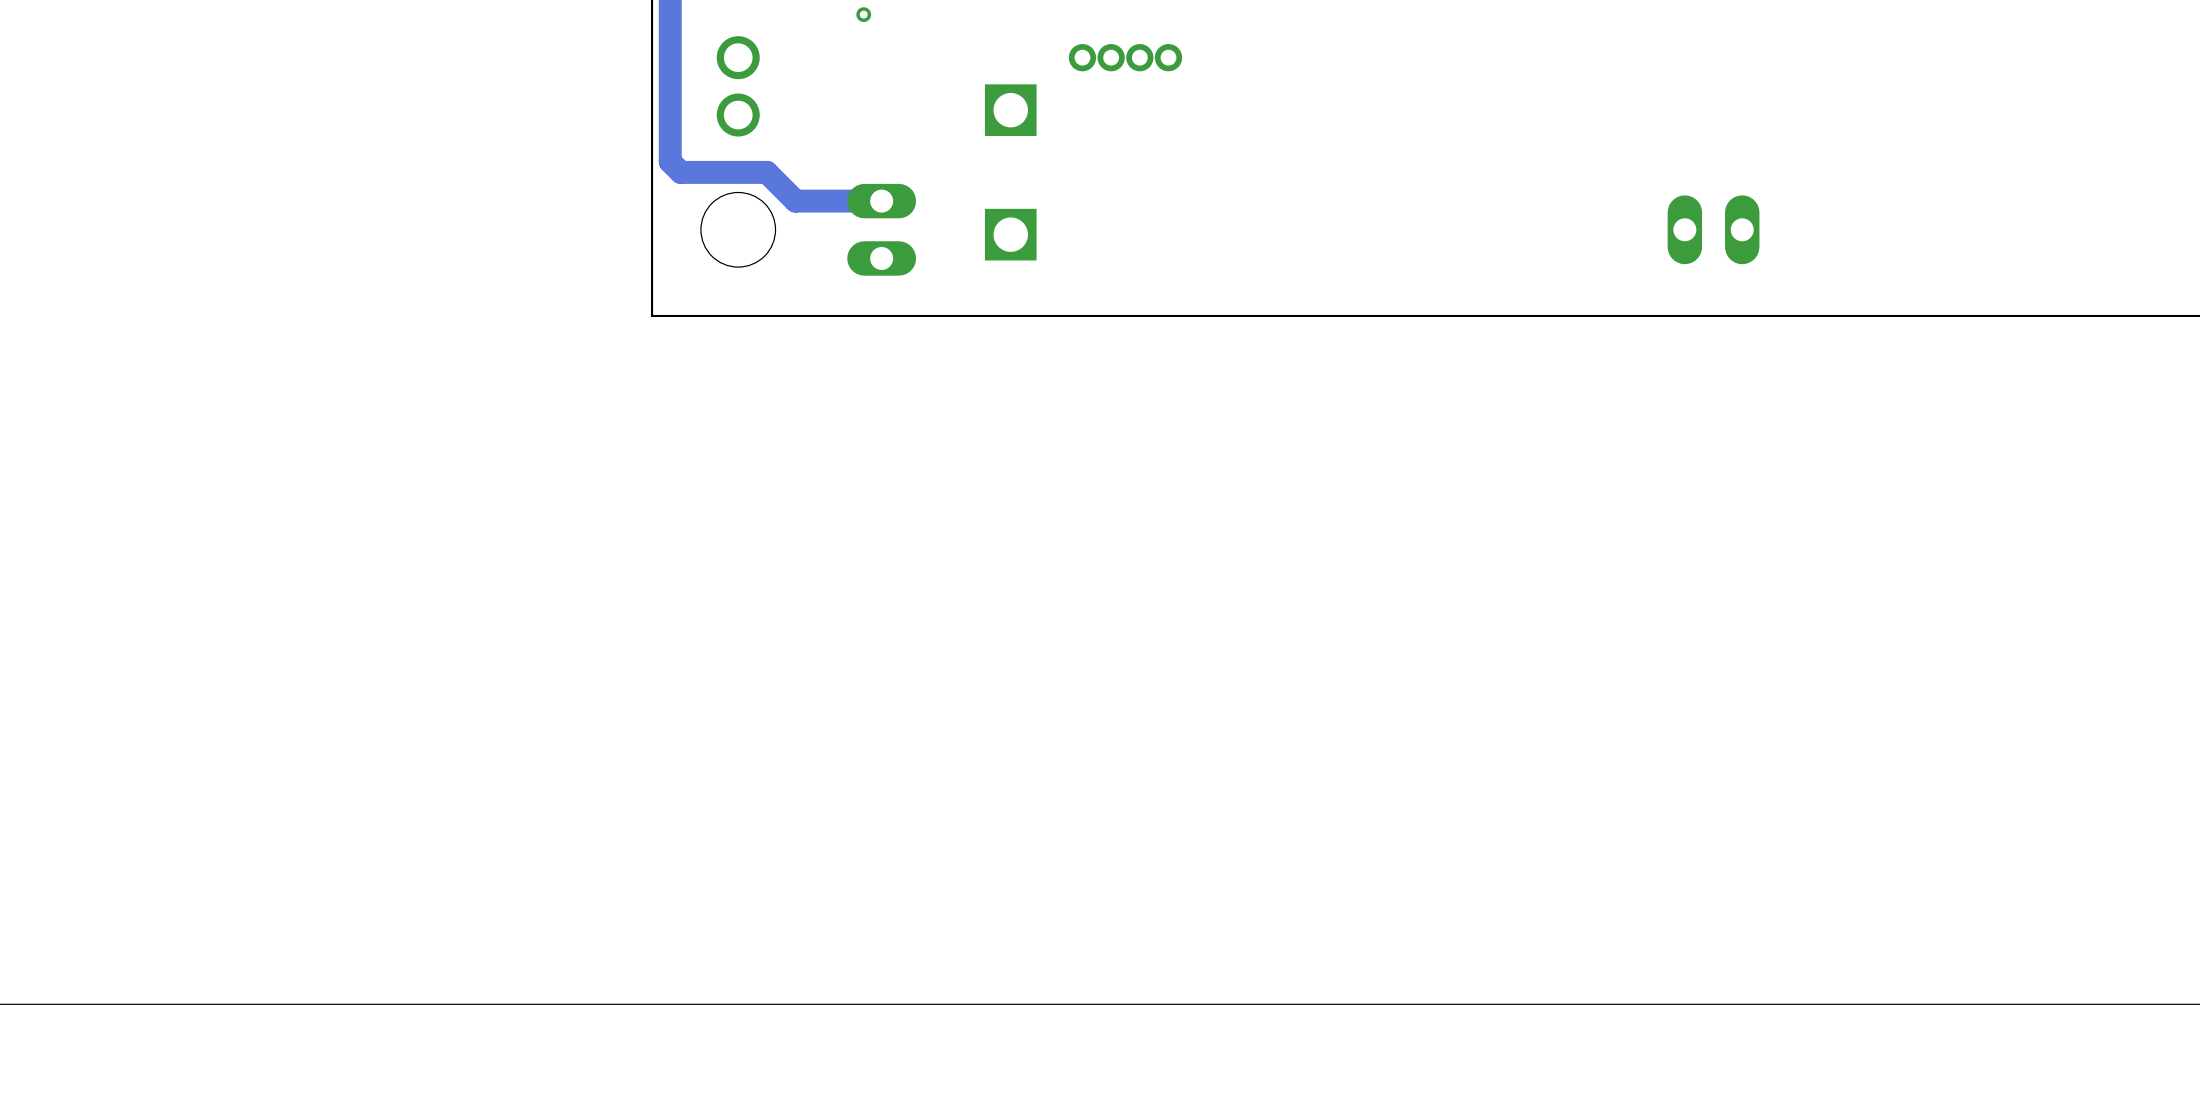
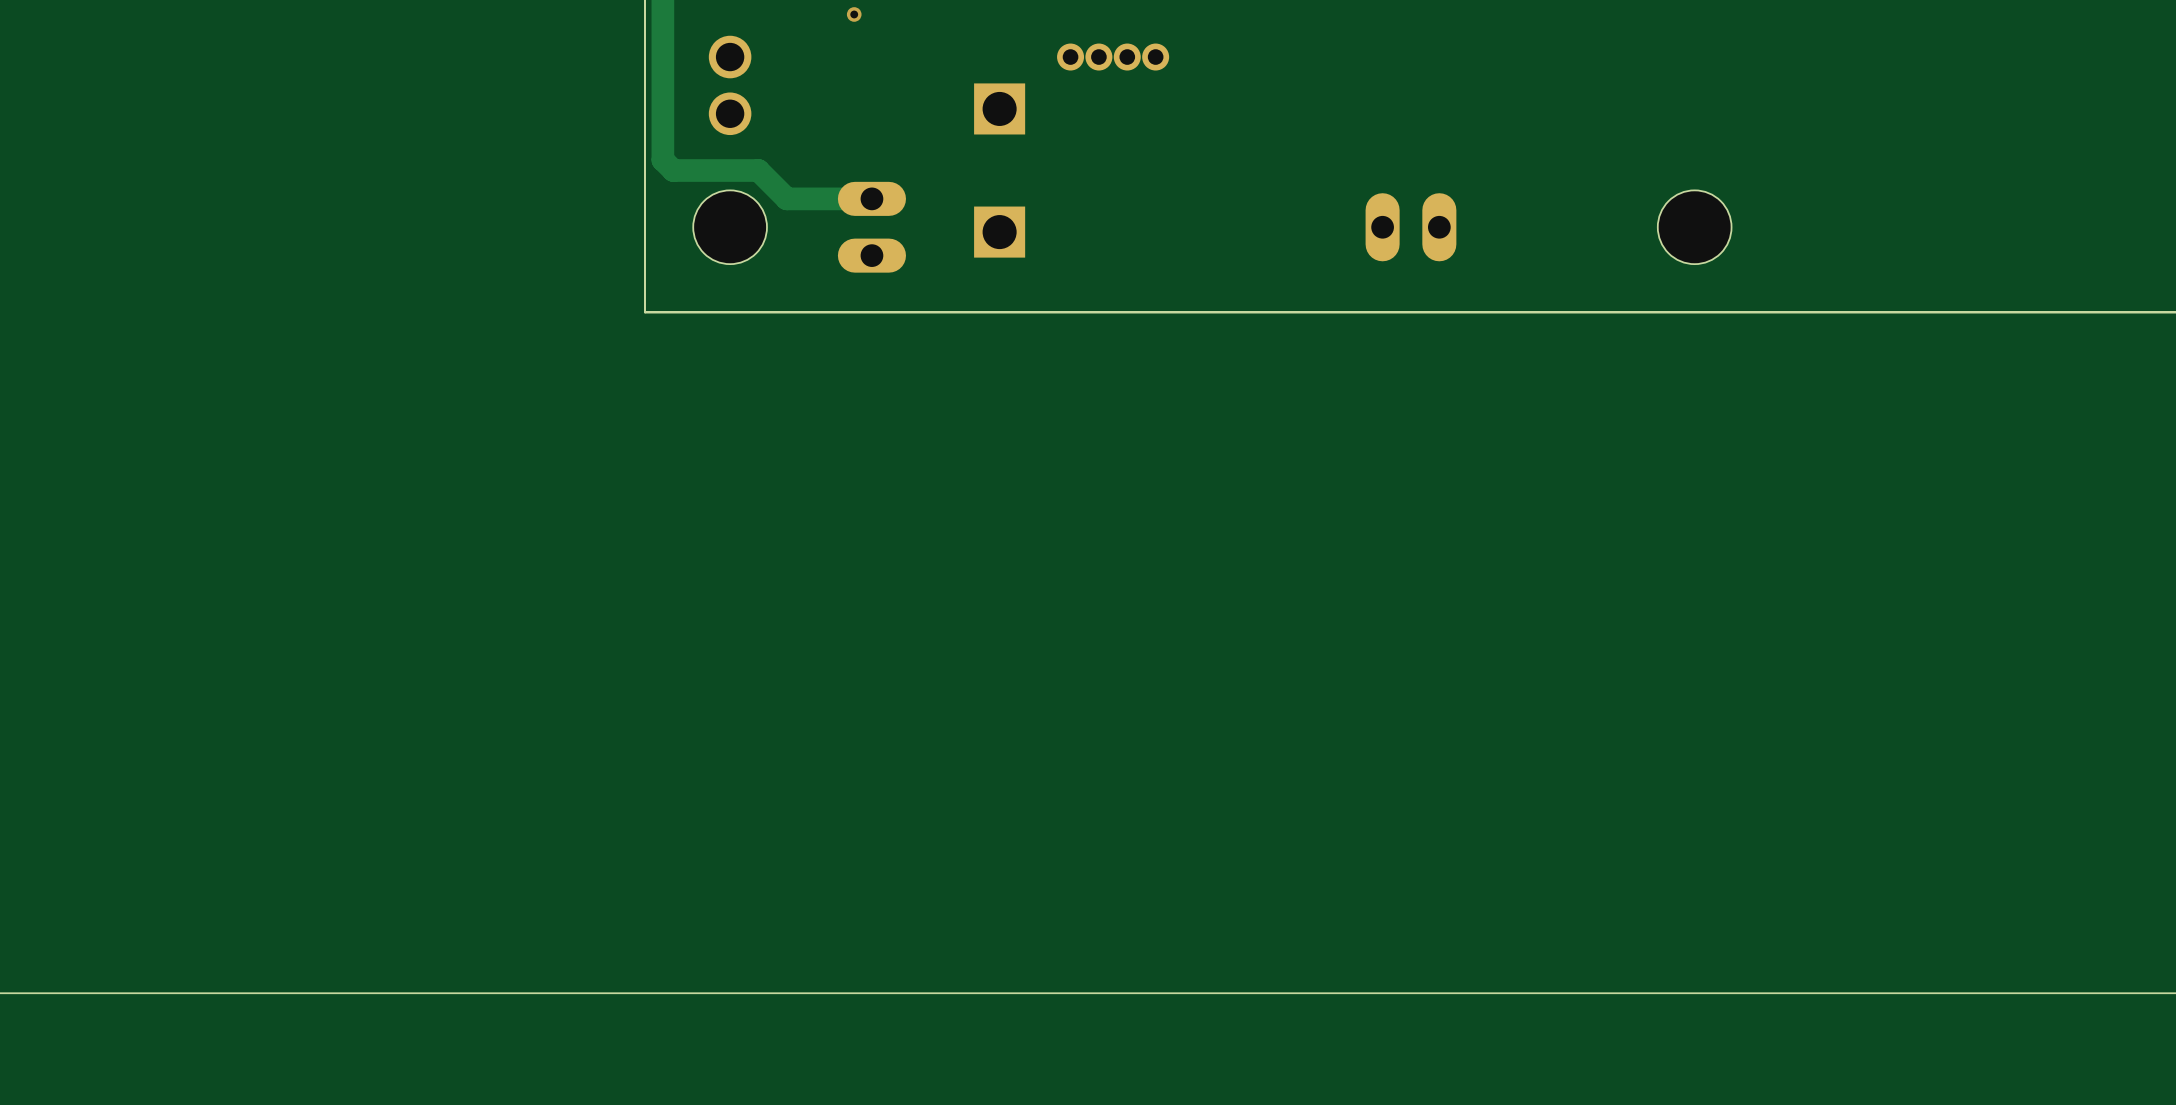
part footprint: [1667, 195, 1760, 265] -> [1657, 190, 1732, 265]
part: none -> (1410, 227)

